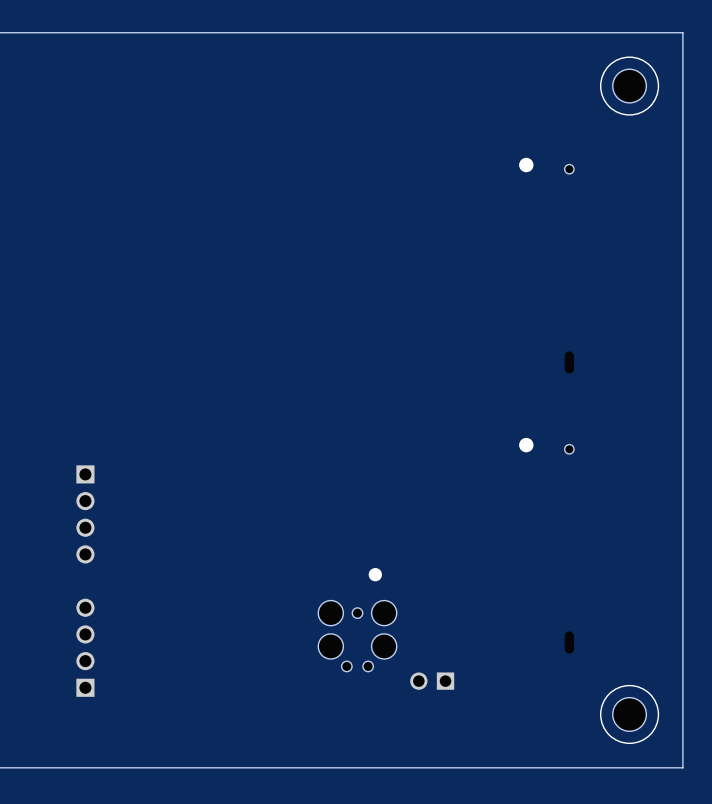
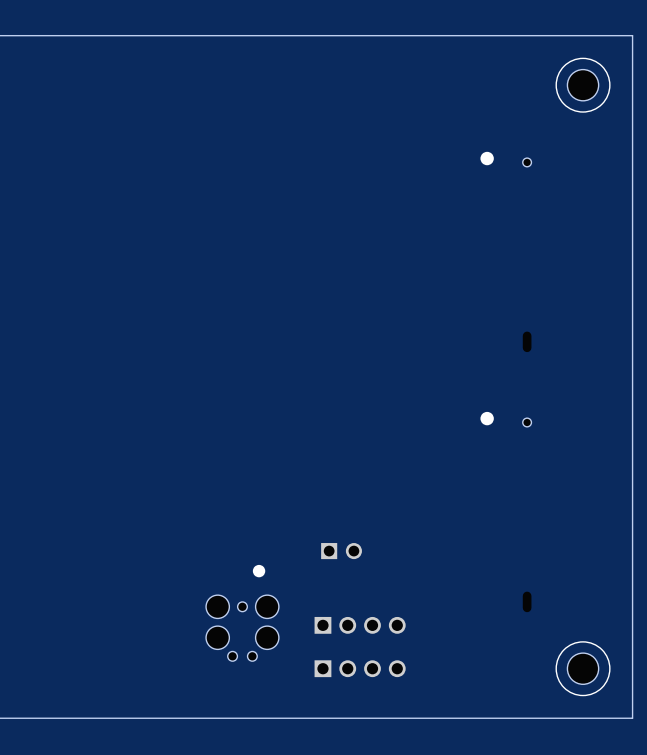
part: (85, 514) -> none
part position: (357, 619) -> (242, 613)
part: (85, 647) -> none
part: none -> (360, 625)
part rotation: 0° (432, 681) -> 180° (341, 551)
part position: (432, 681) -> (341, 551)
part: none -> (360, 668)

